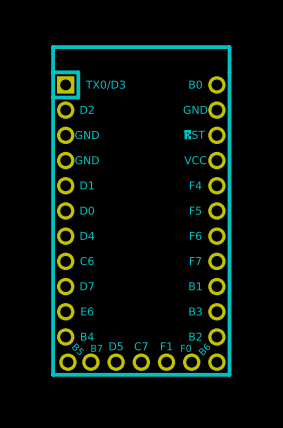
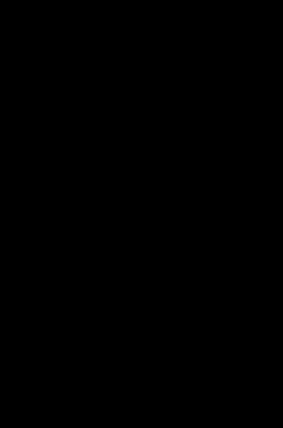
part: (141, 210) -> none

